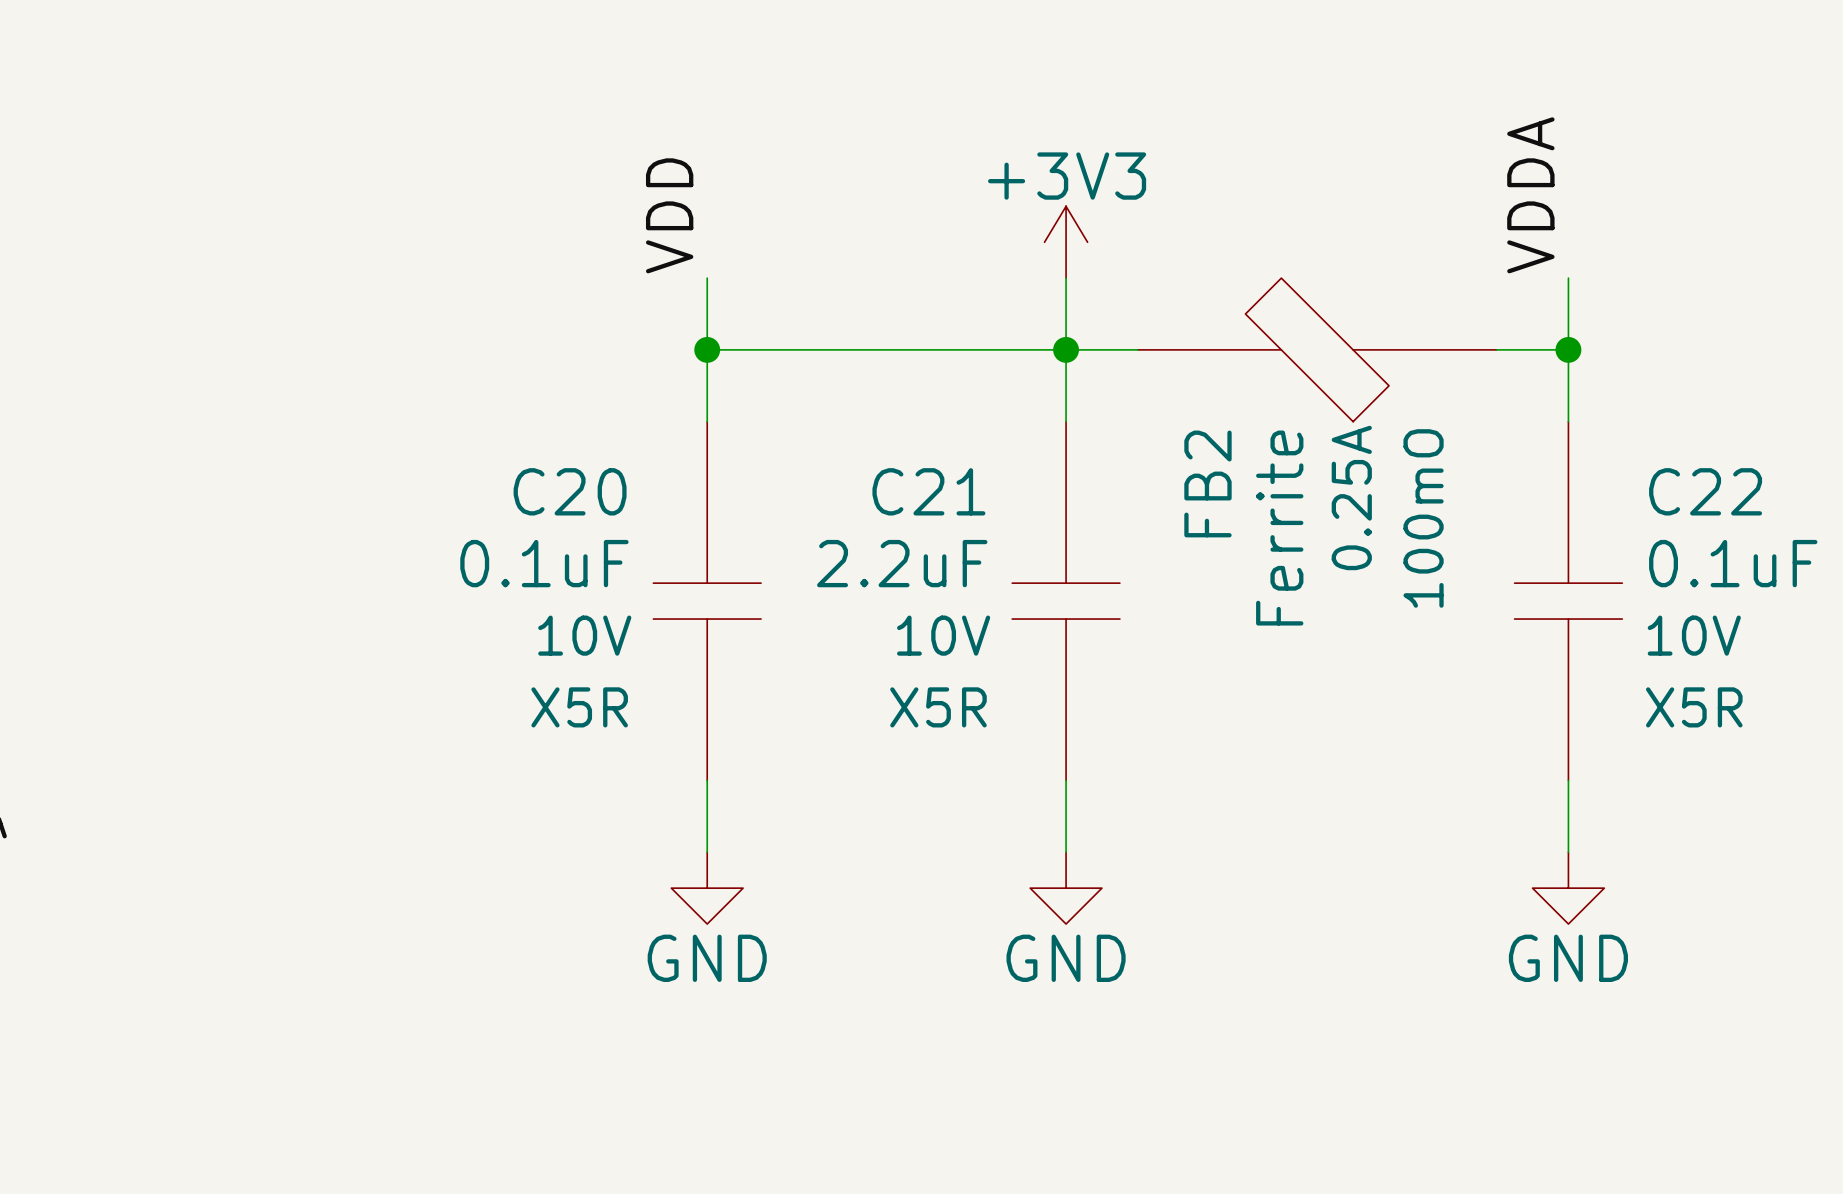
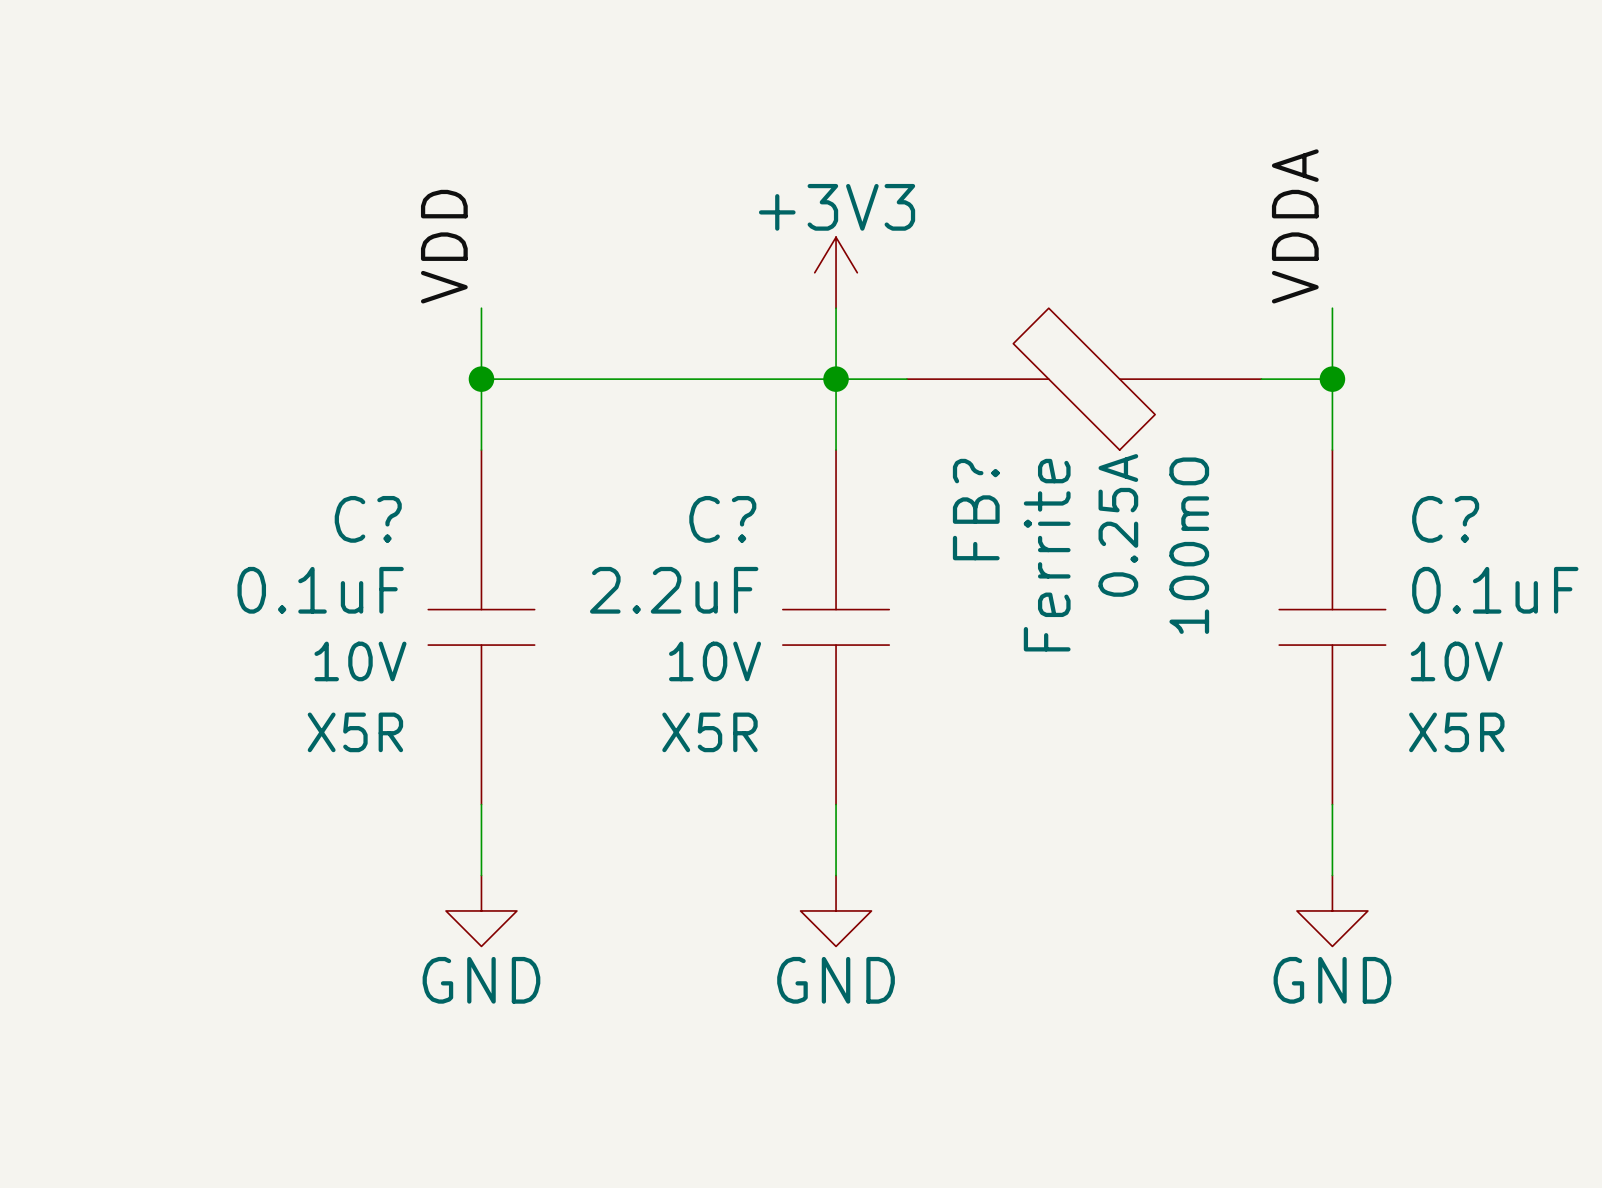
FB2 name: FB2 (1207, 483) -> FB? (976, 509)
C20 name: C20 (570, 491) -> C? (368, 519)
C21 name: C21 (928, 491) -> C? (722, 519)
C22 name: C22 (1705, 491) -> C? (1445, 519)

